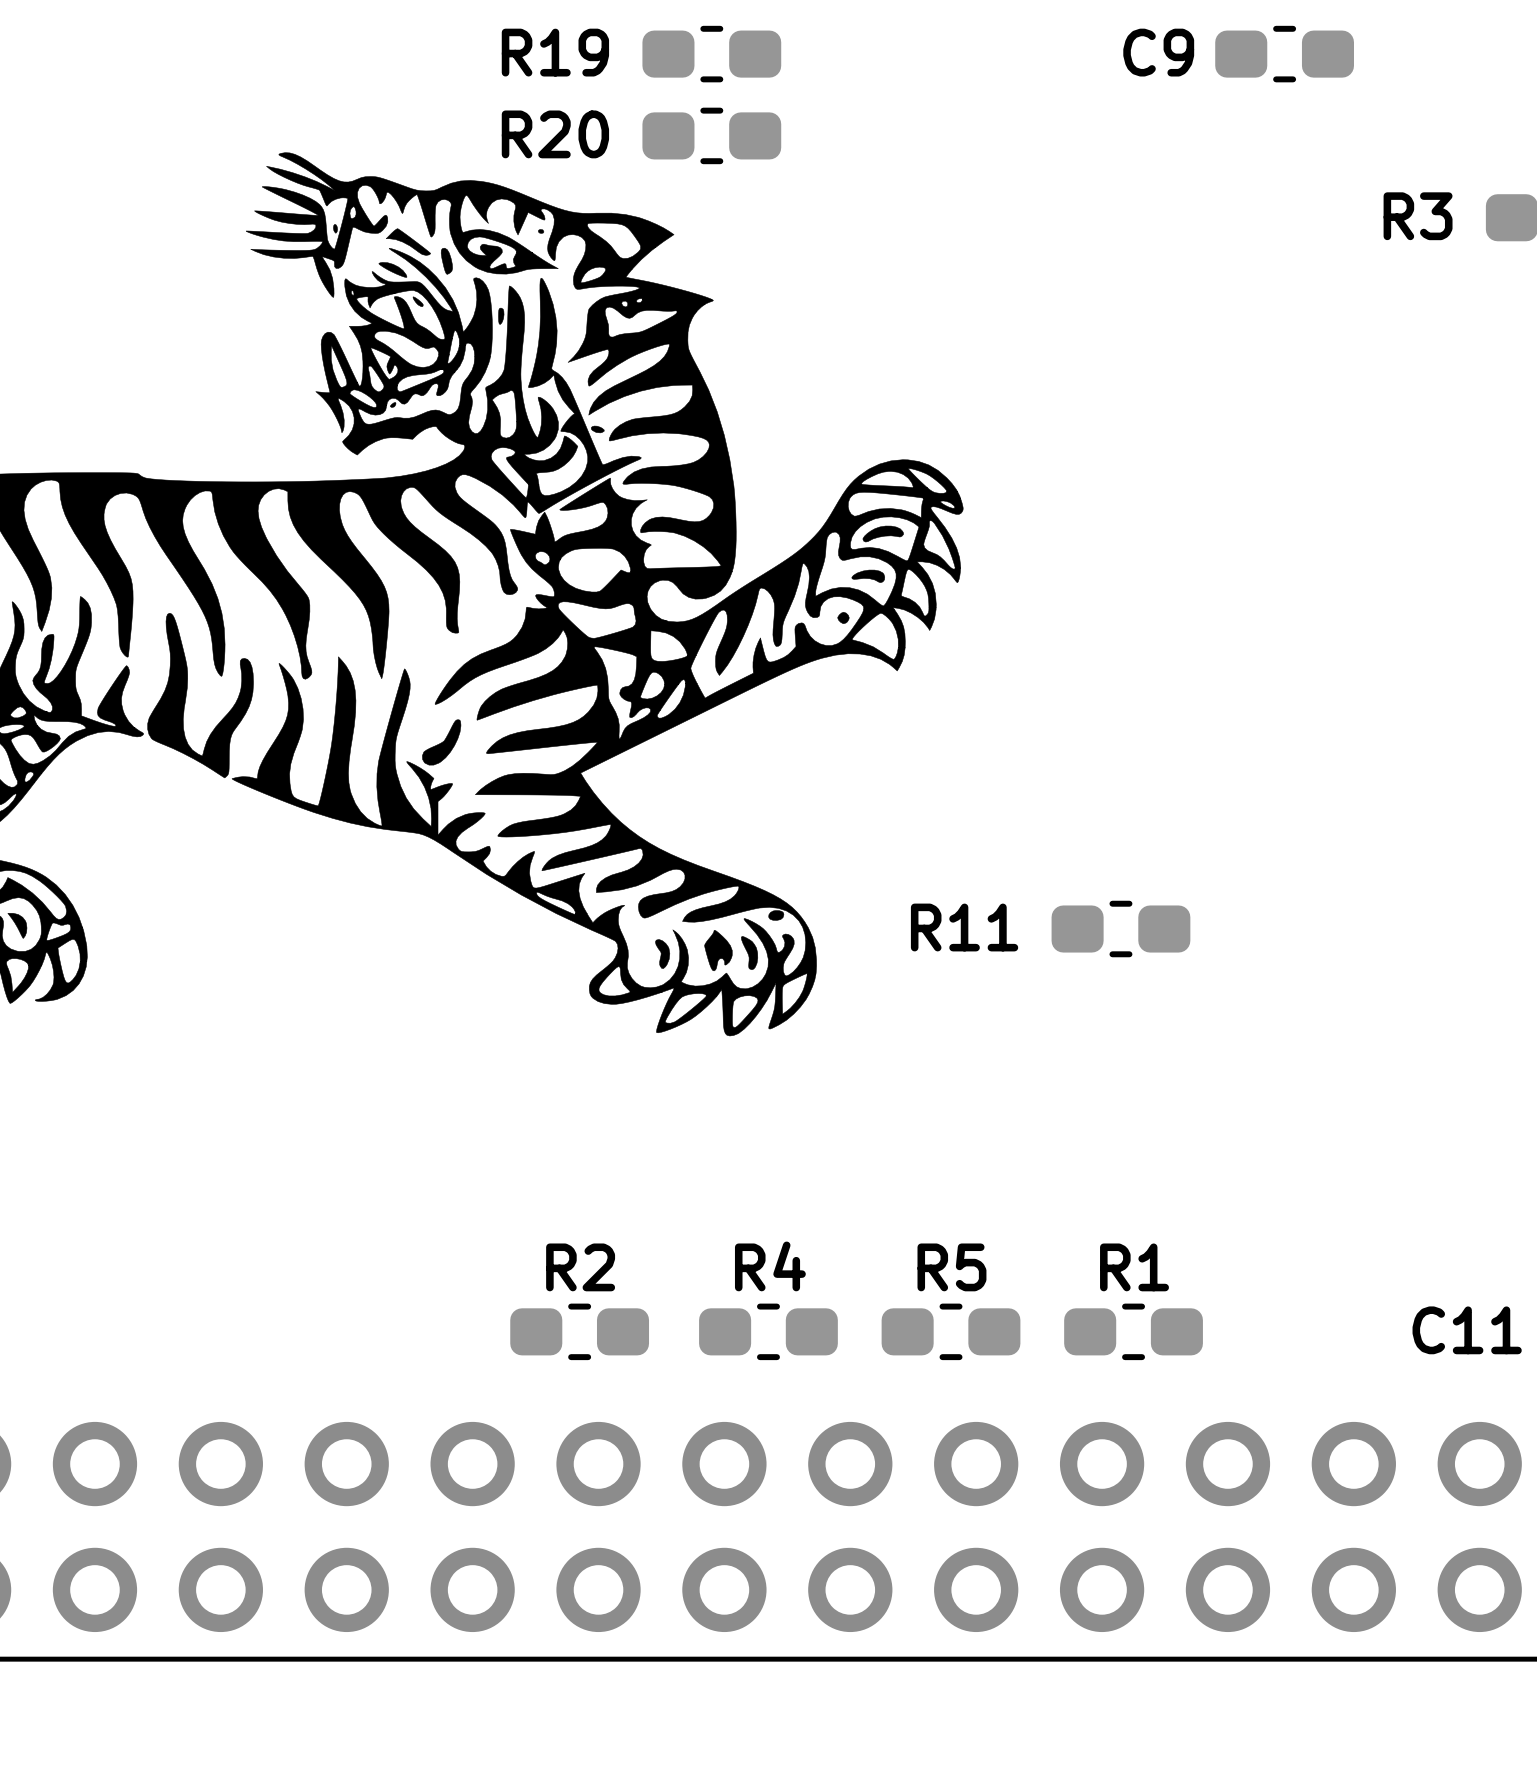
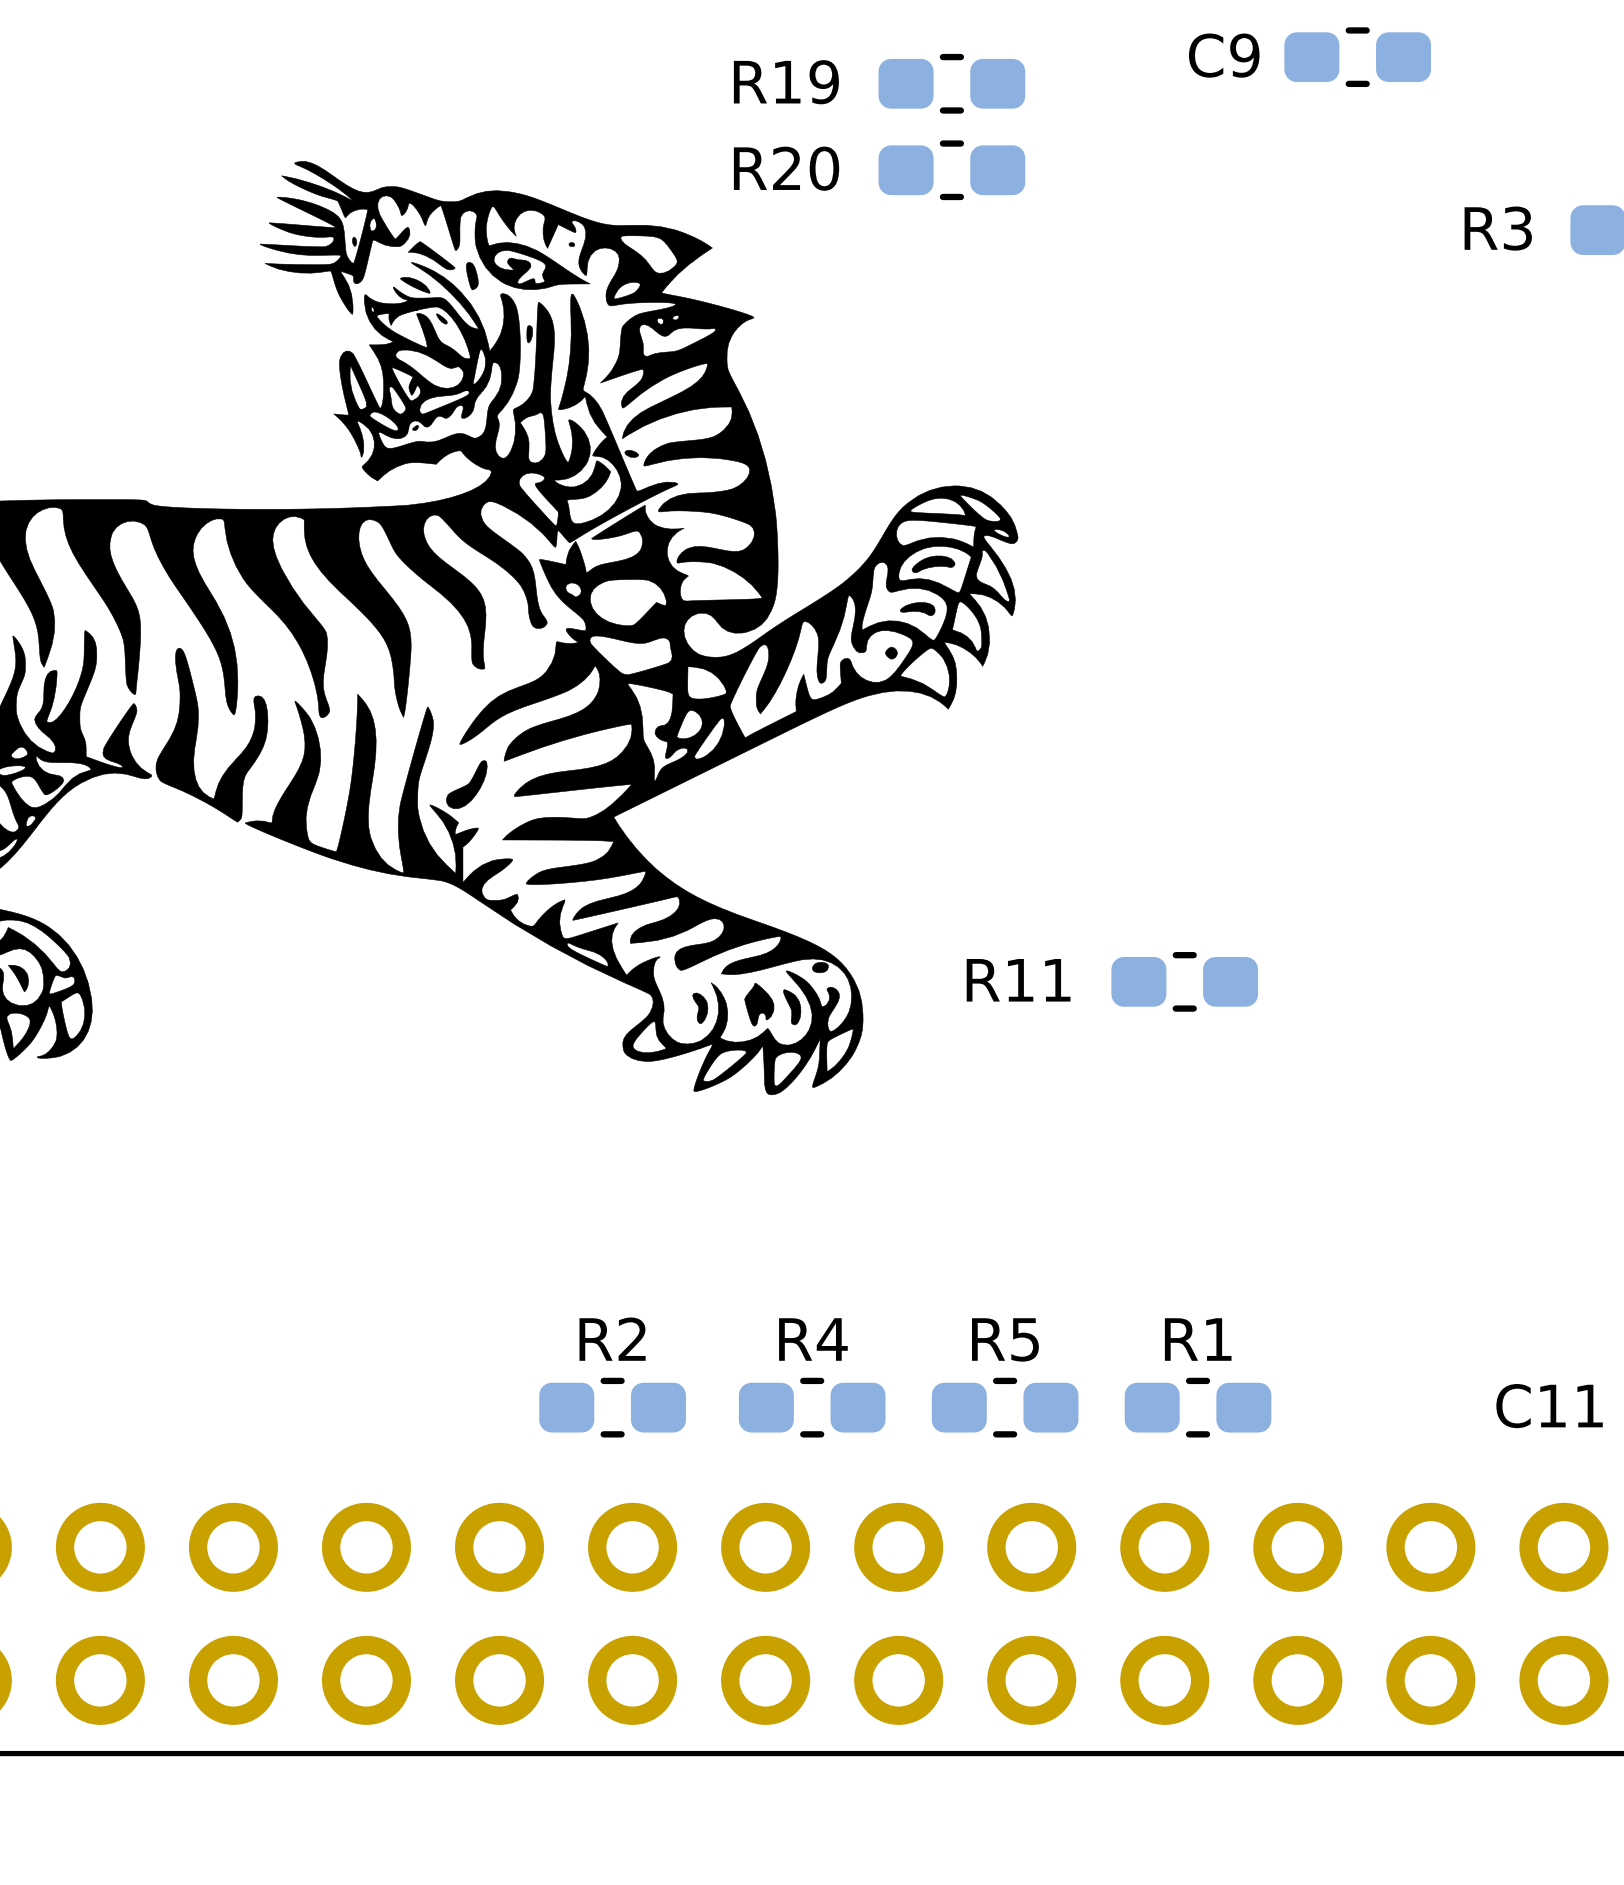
R19 position: (711, 54) -> (951, 83)
R20 position: (711, 135) -> (951, 170)

